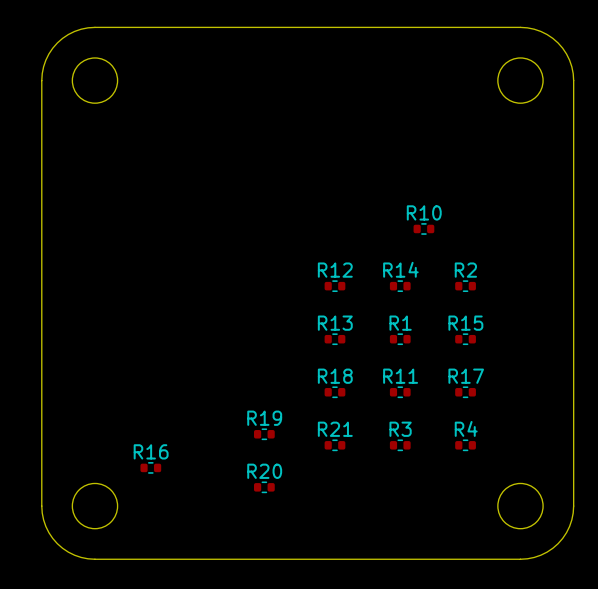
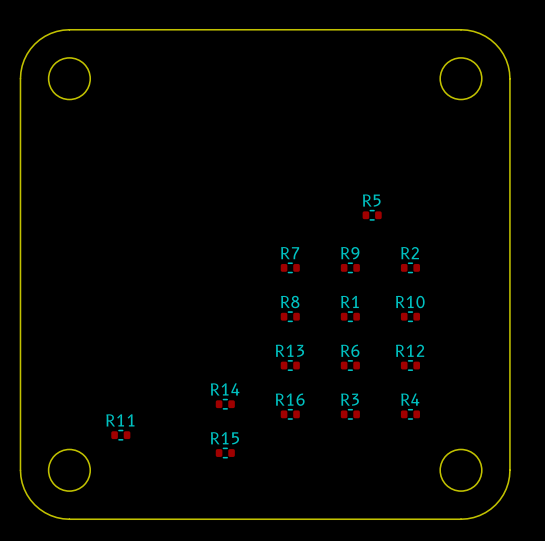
R10 name: R10 (424, 212) -> R5 (371, 200)
R14 name: R14 (400, 269) -> R9 (350, 253)
R12 name: R12 (335, 270) -> R7 (290, 253)
R13 name: R13 (335, 323) -> R8 (290, 302)
R15 name: R15 (465, 323) -> R10 (410, 302)
R18 name: R18 (335, 376) -> R13 (289, 350)
R11 name: R11 (400, 376) -> R6 (350, 350)
R17 name: R17 (466, 376) -> R12 (410, 350)
R19 name: R19 (264, 418) -> R14 (225, 389)
R21 name: R21 (335, 429) -> R16 (290, 399)
R16 name: R16 (151, 451) -> R11 (120, 420)
R20 name: R20 (264, 471) -> R15 (224, 438)

